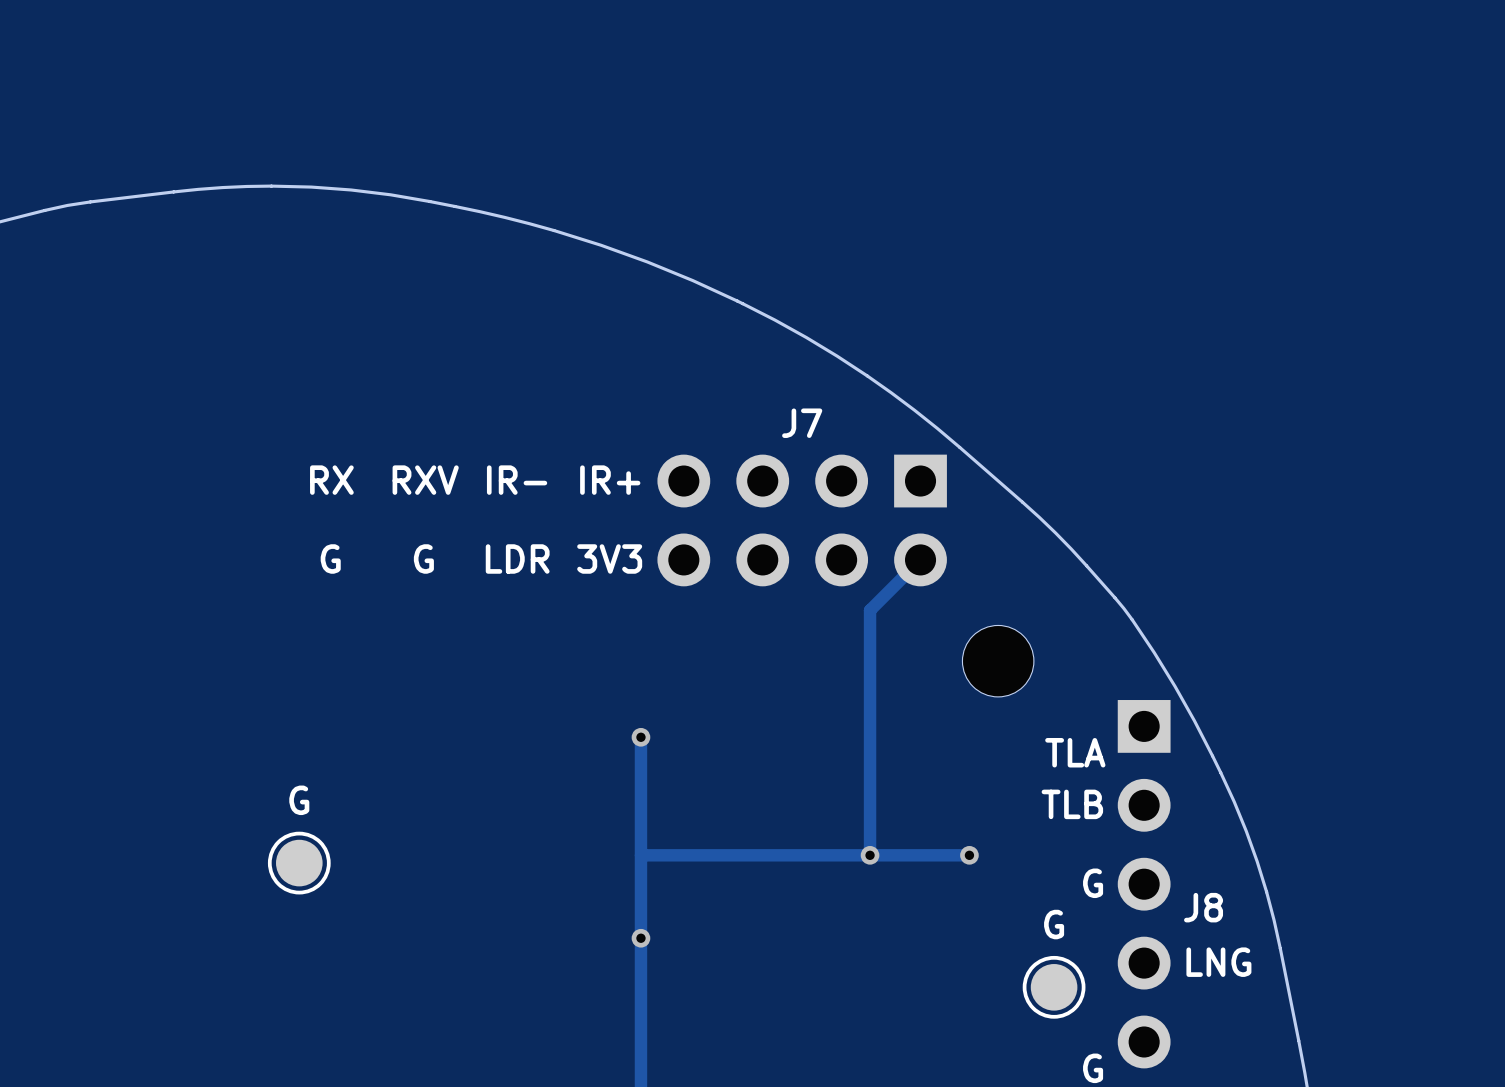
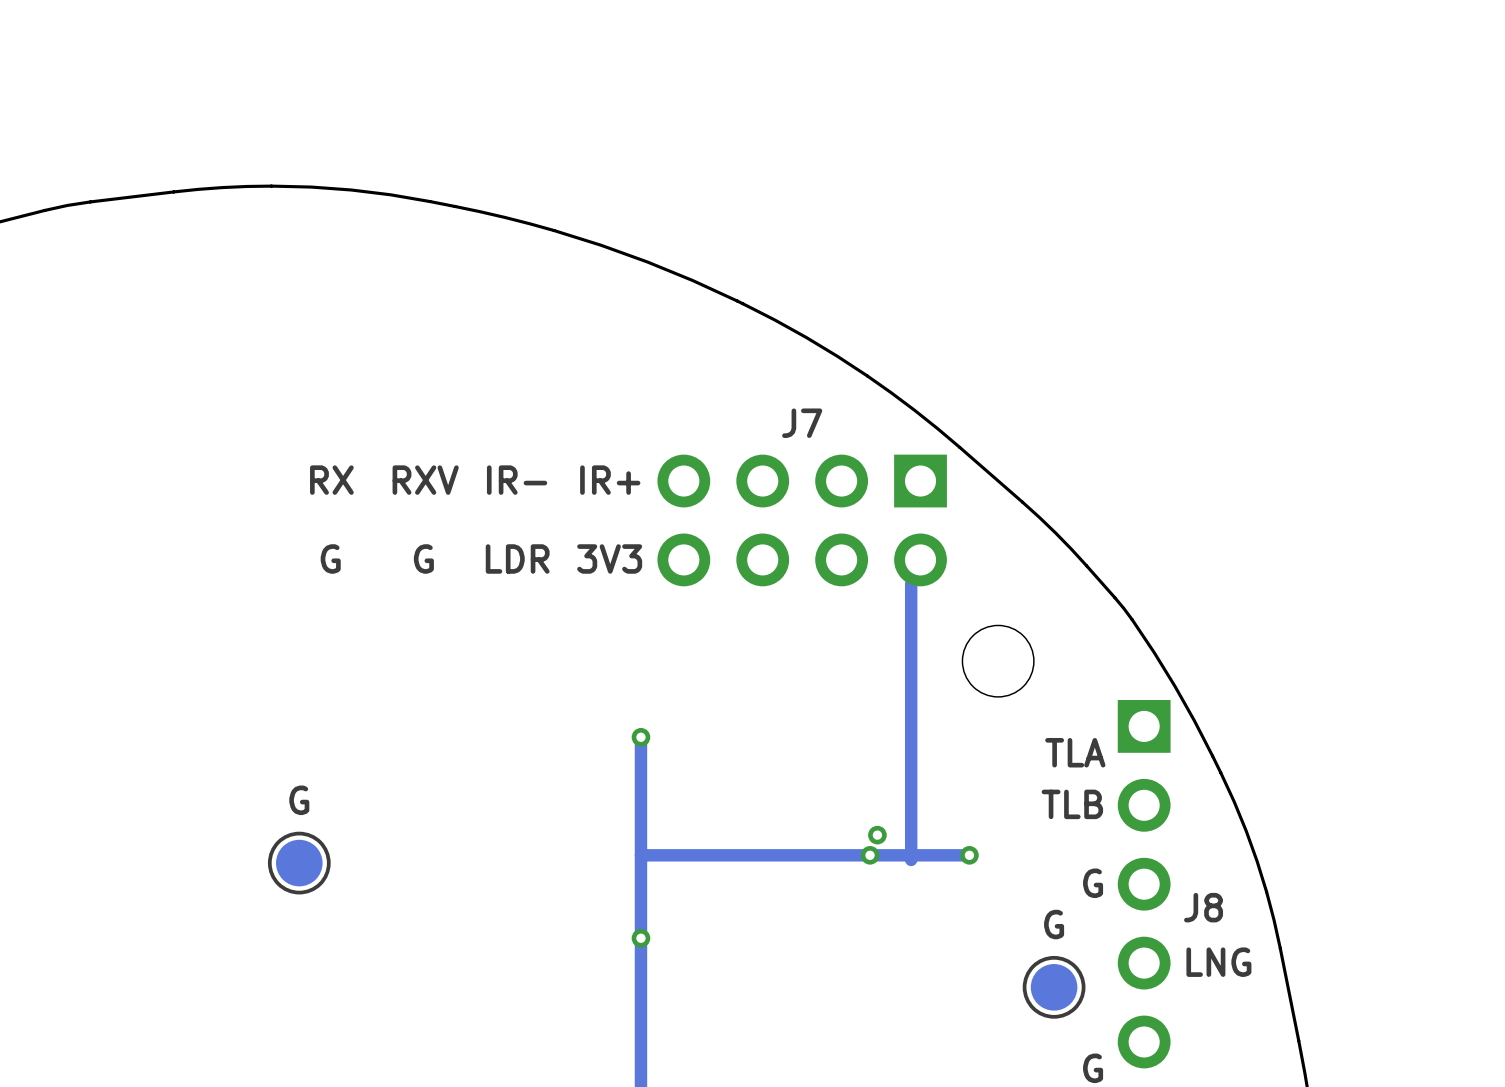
track: (920, 559) (870, 610) (870, 855) -> none
track: none -> (911, 583) (911, 859)
via: none -> (877, 835)

